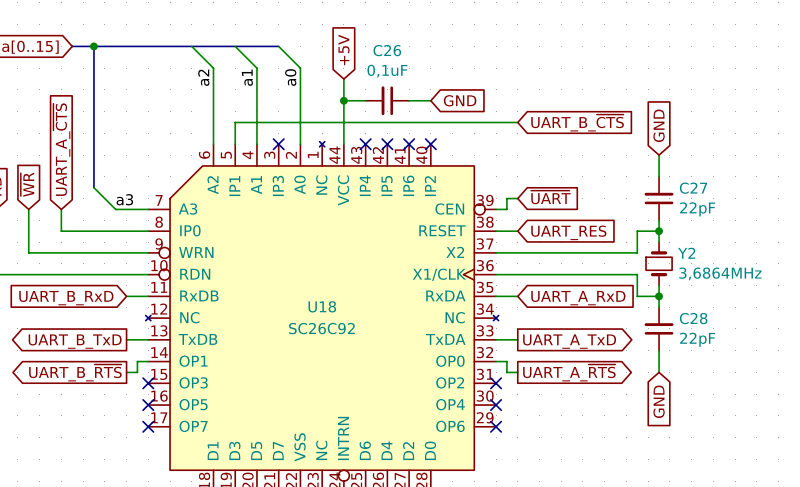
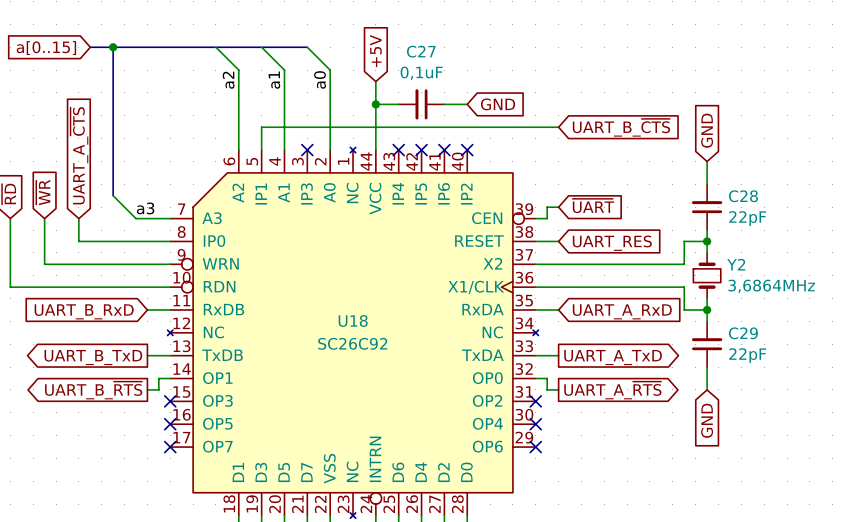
C26 name: C26 (387, 50) -> C27 (421, 51)
C27 name: C27 (693, 188) -> C28 (743, 196)
C28 name: C28 (693, 318) -> C29 (743, 333)

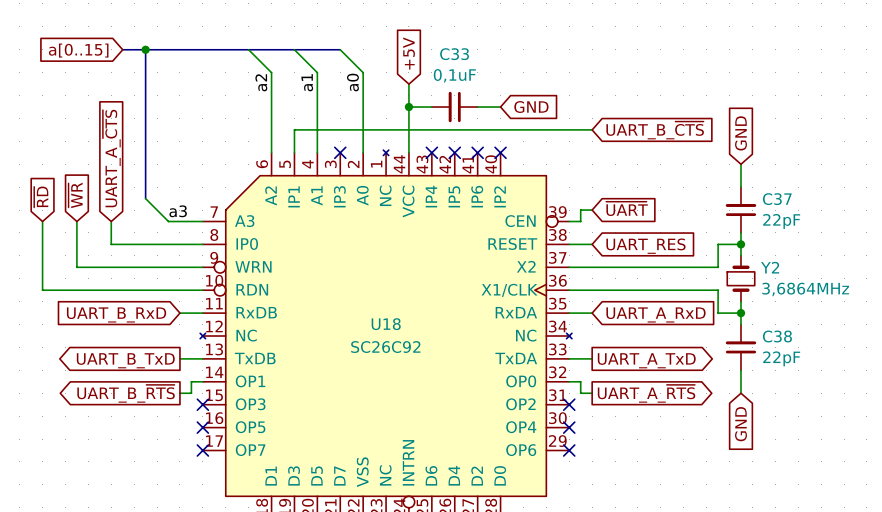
C27 name: C27 (421, 51) -> C33 (454, 54)
C28 name: C28 (743, 196) -> C37 (777, 199)
C29 name: C29 (743, 333) -> C38 (777, 336)

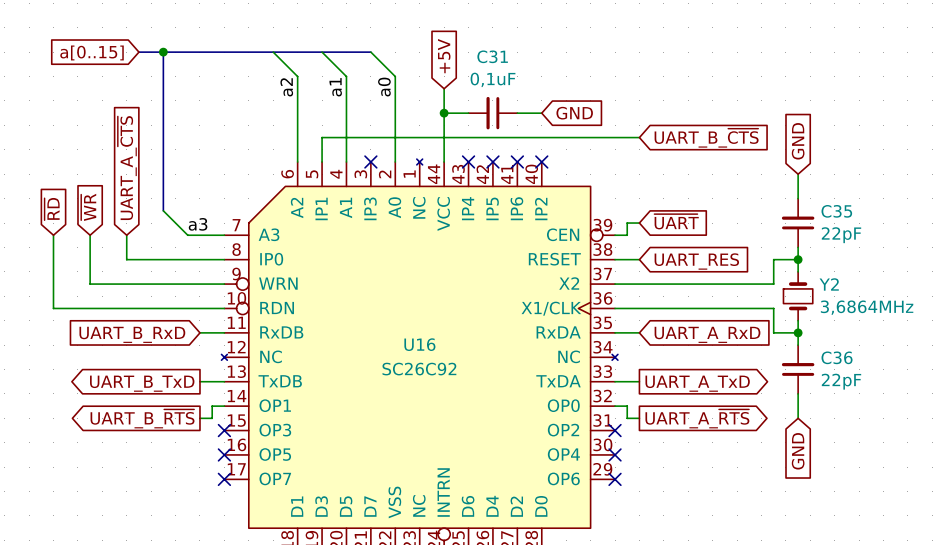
C33 name: C33 (454, 54) -> C31 (492, 56)
C37 name: C37 (777, 199) -> C35 (836, 211)
U18 name: U18 (386, 324) -> U16 (419, 344)
C38 name: C38 (777, 336) -> C36 (837, 357)

